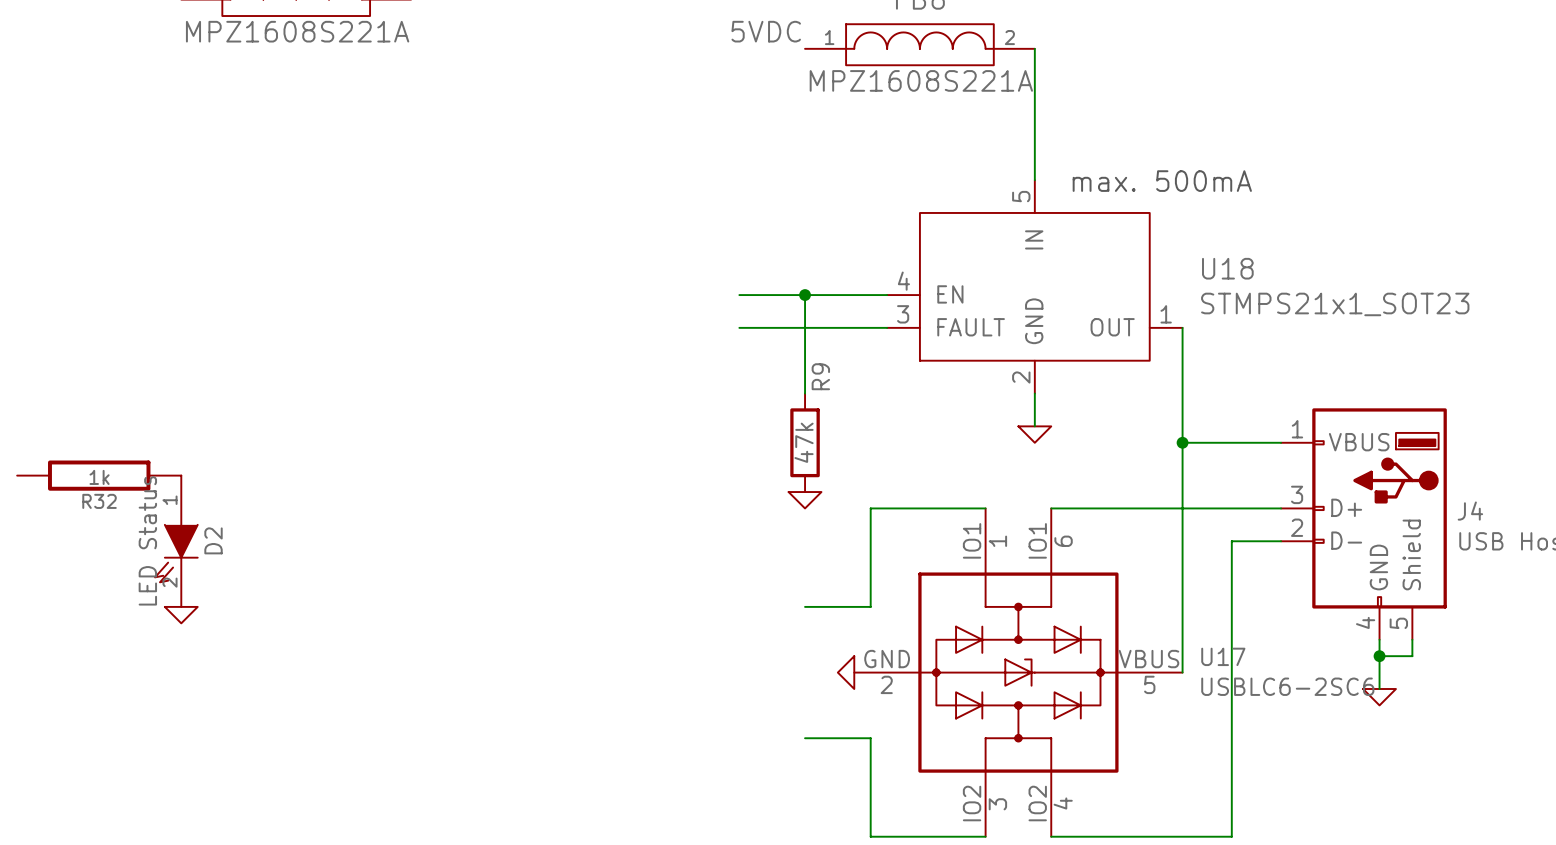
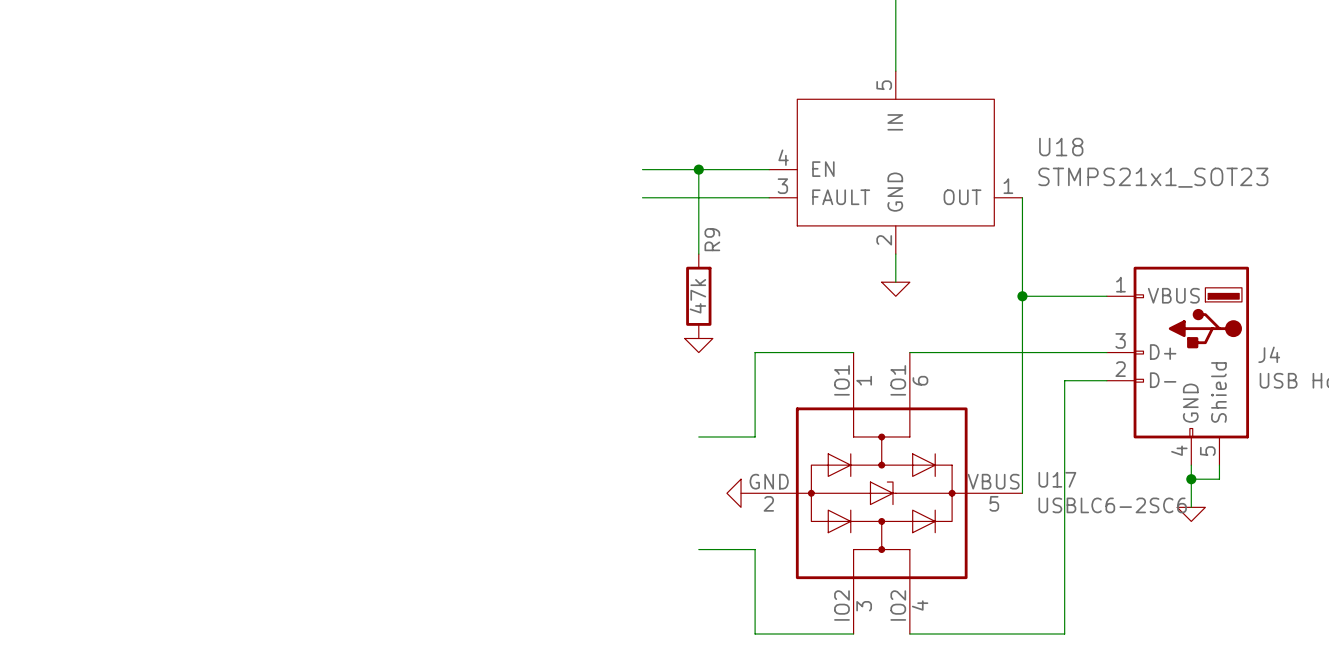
text: max. 500mA (1162, 181) -> none
R32: 1k (99, 475) -> none
D2: LED Status (176, 541) -> none
power symbol: (181, 615) -> none

